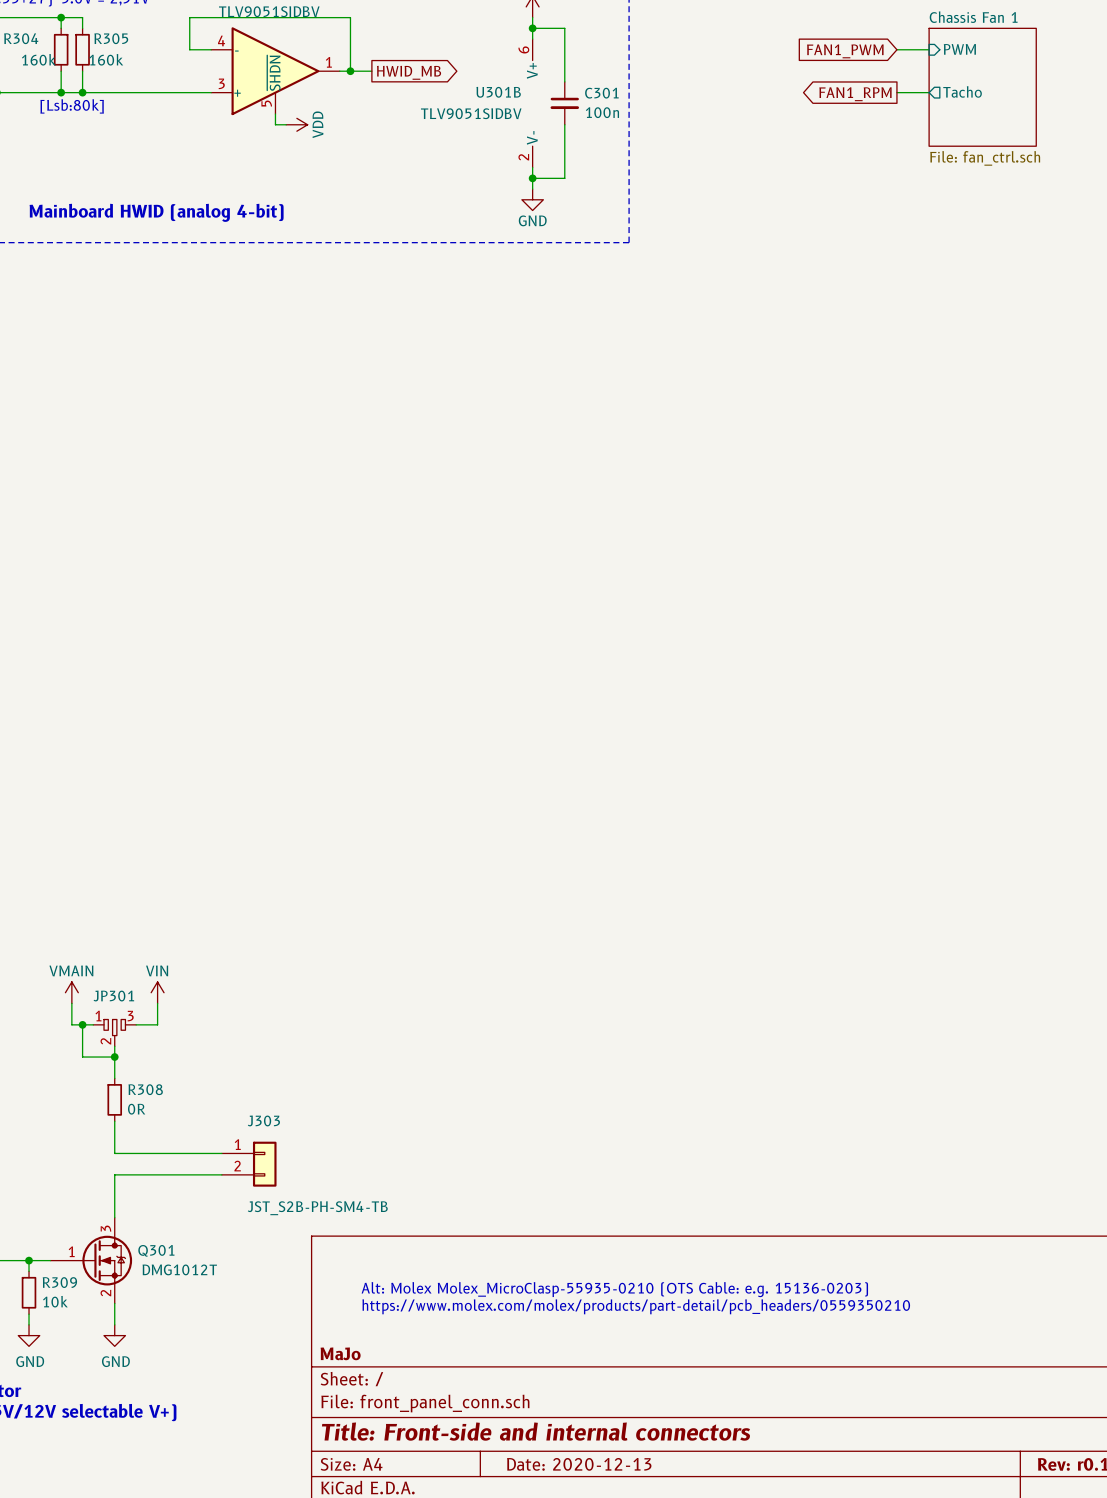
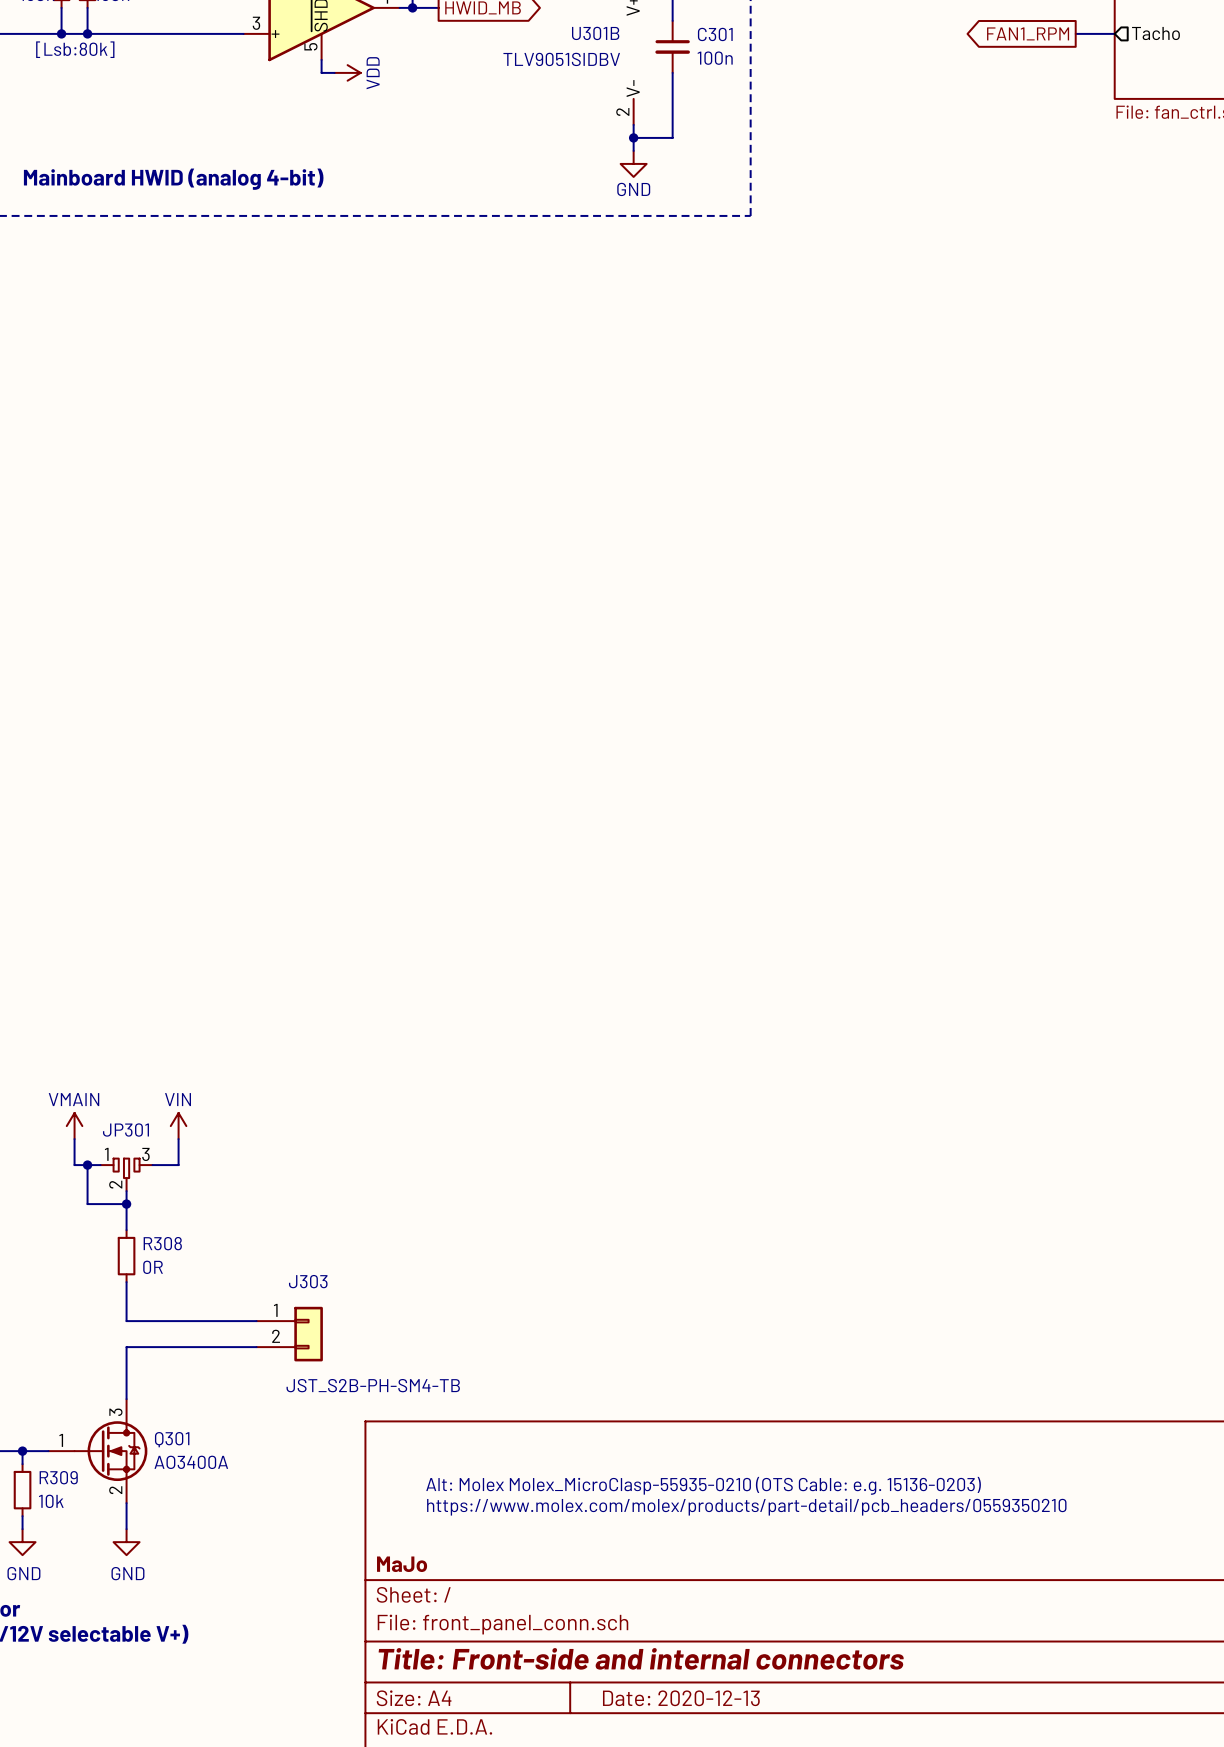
Q301 symbol: [50, 1217, 133, 1304] -> [48, 1399, 148, 1504]
Q301 value: DMG1012T (179, 1269) -> AO3400A (191, 1462)

